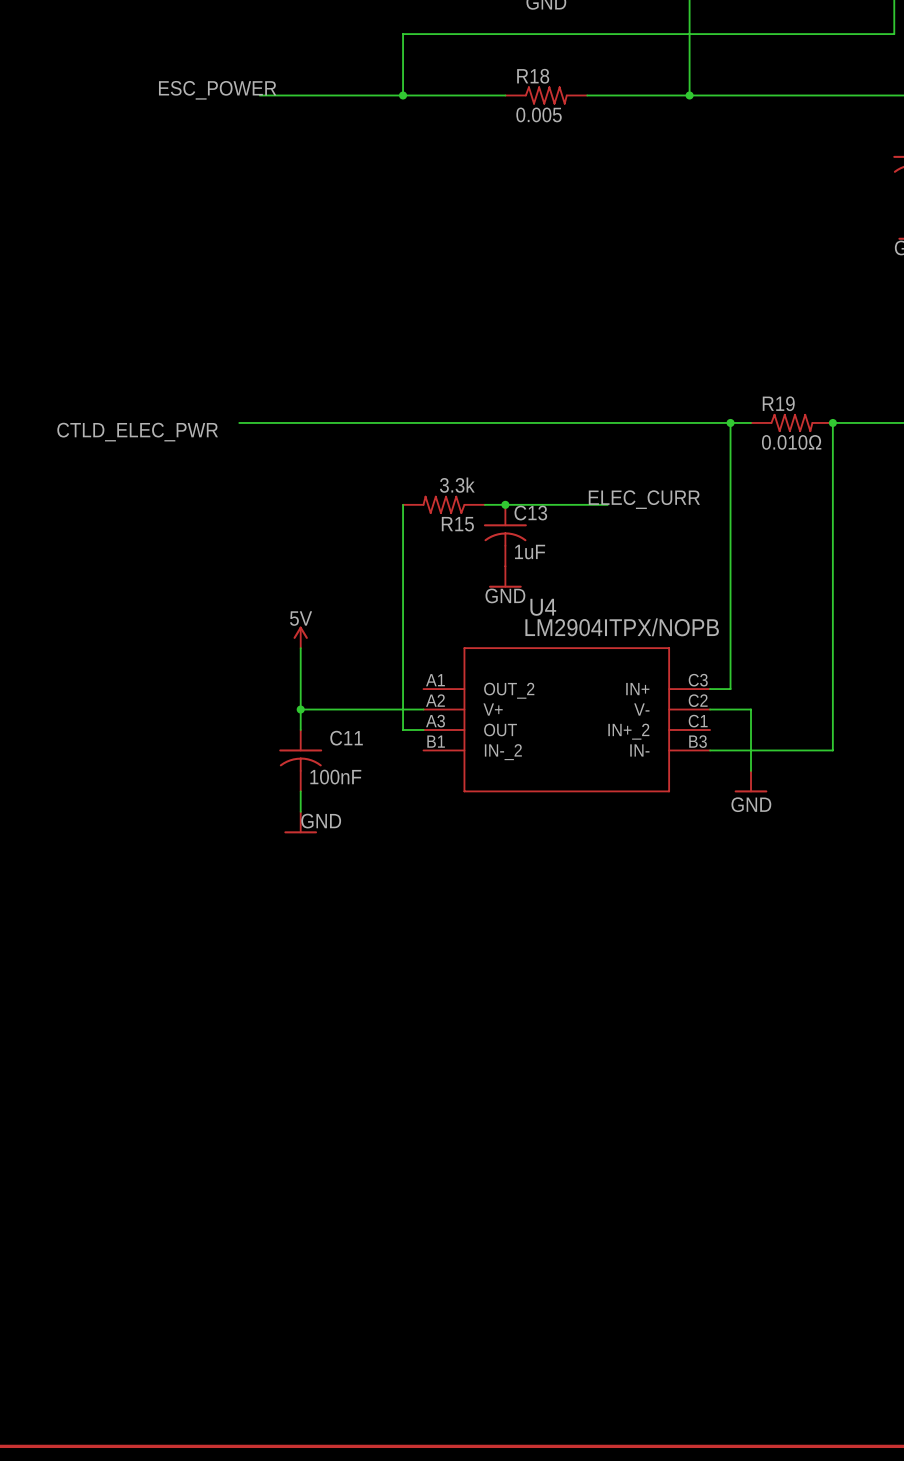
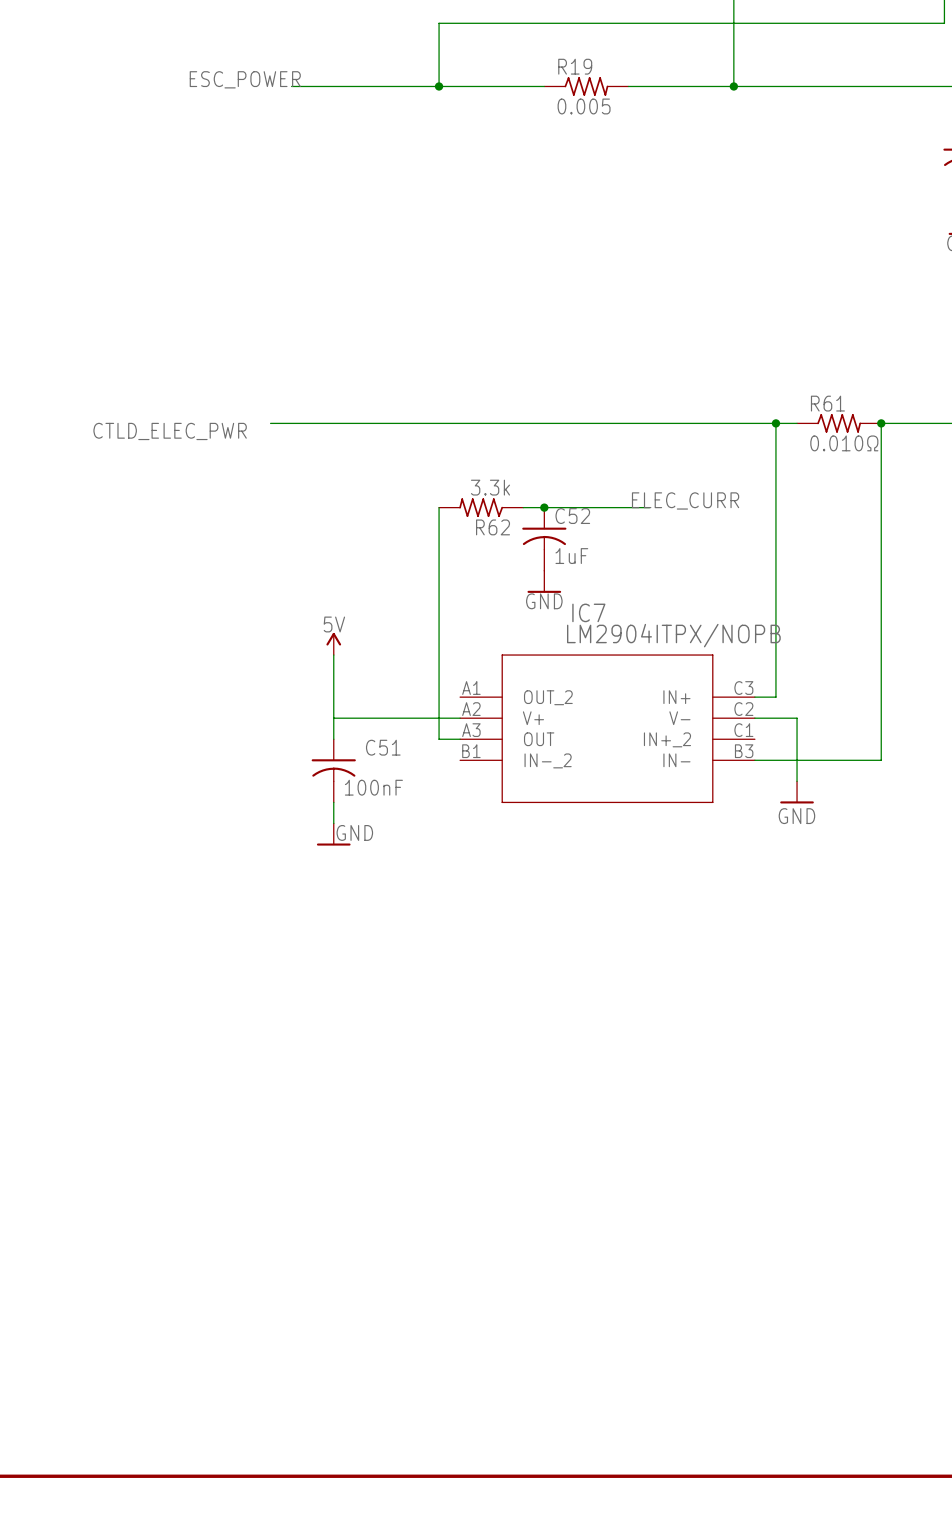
R18 name: R18 (533, 76) -> R19 (575, 66)
R19 name: R19 (778, 403) -> R61 (827, 403)
C13 name: C13 (530, 513) -> C52 (572, 516)
R15 name: R15 (457, 524) -> R62 (493, 527)
U4 name: U4 (543, 607) -> IC7 (588, 612)
junction: (300, 709) -> none
C11 name: C11 (346, 738) -> C51 (383, 747)

